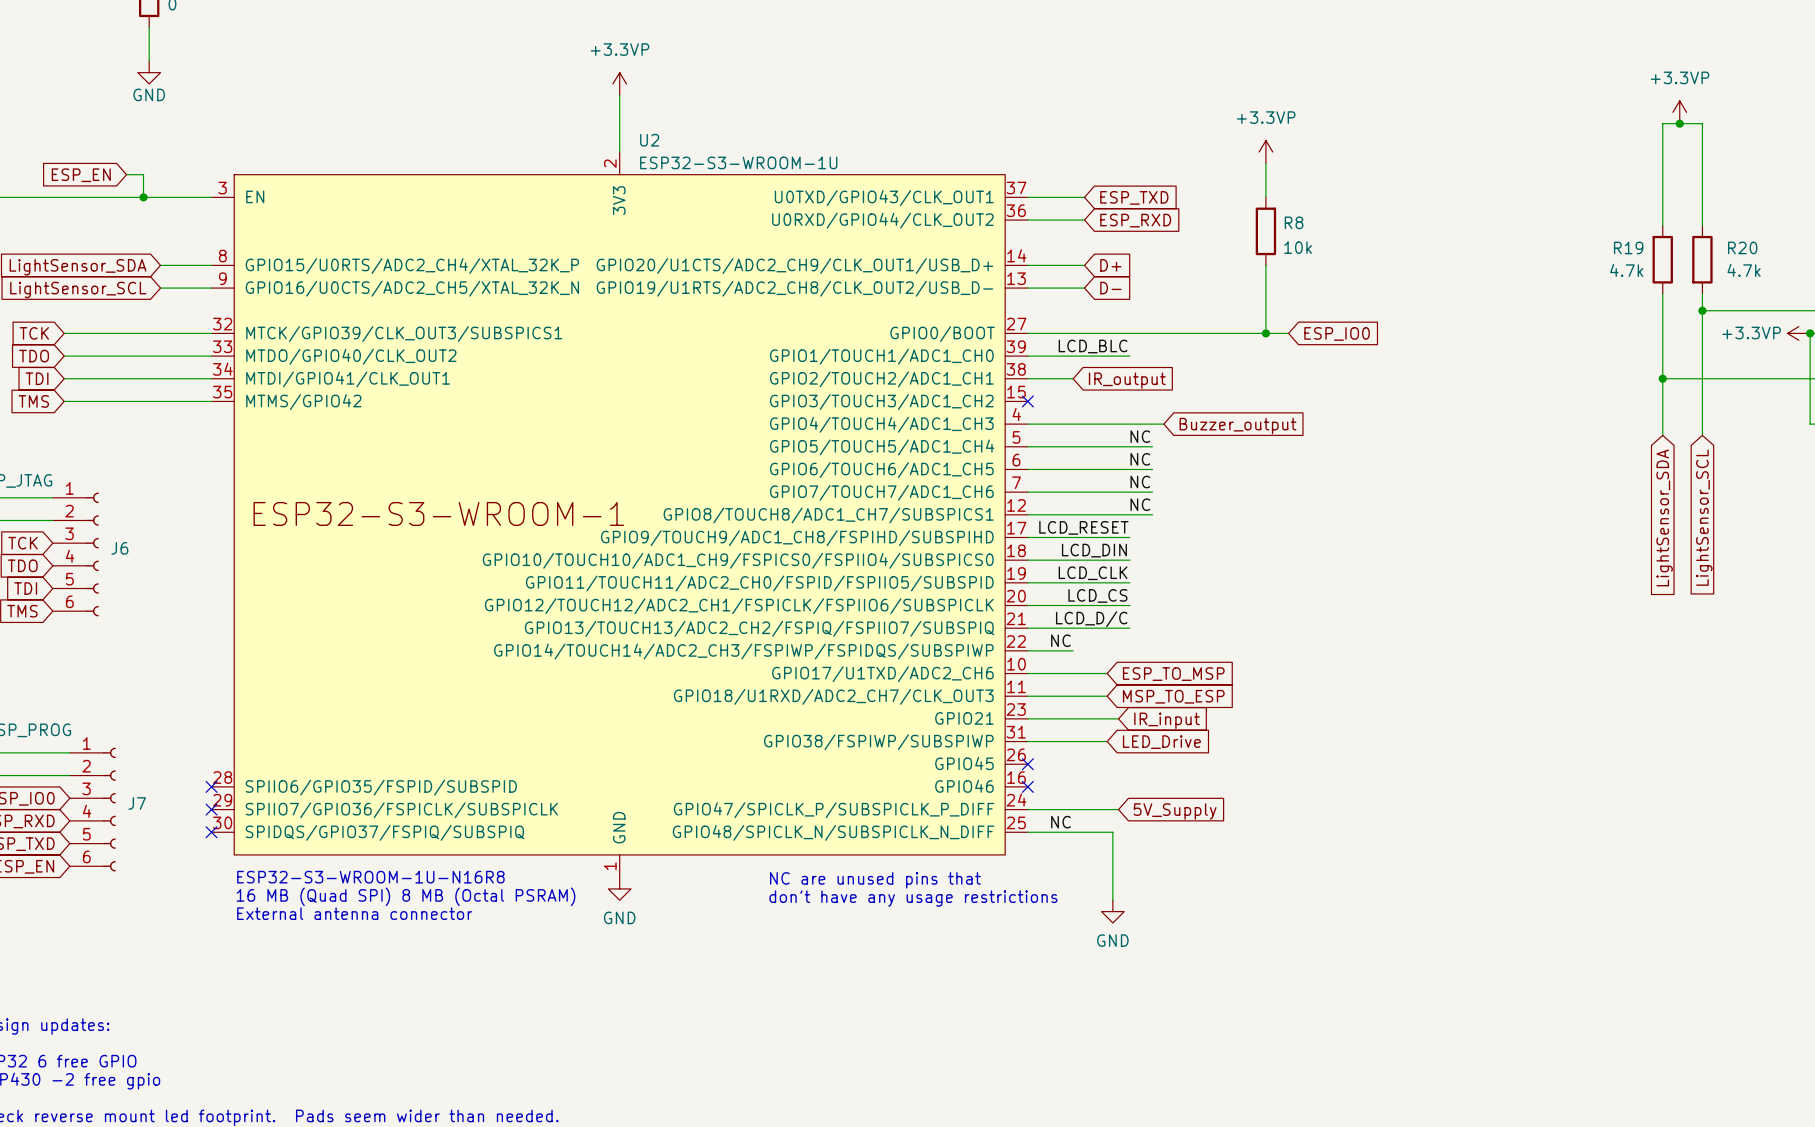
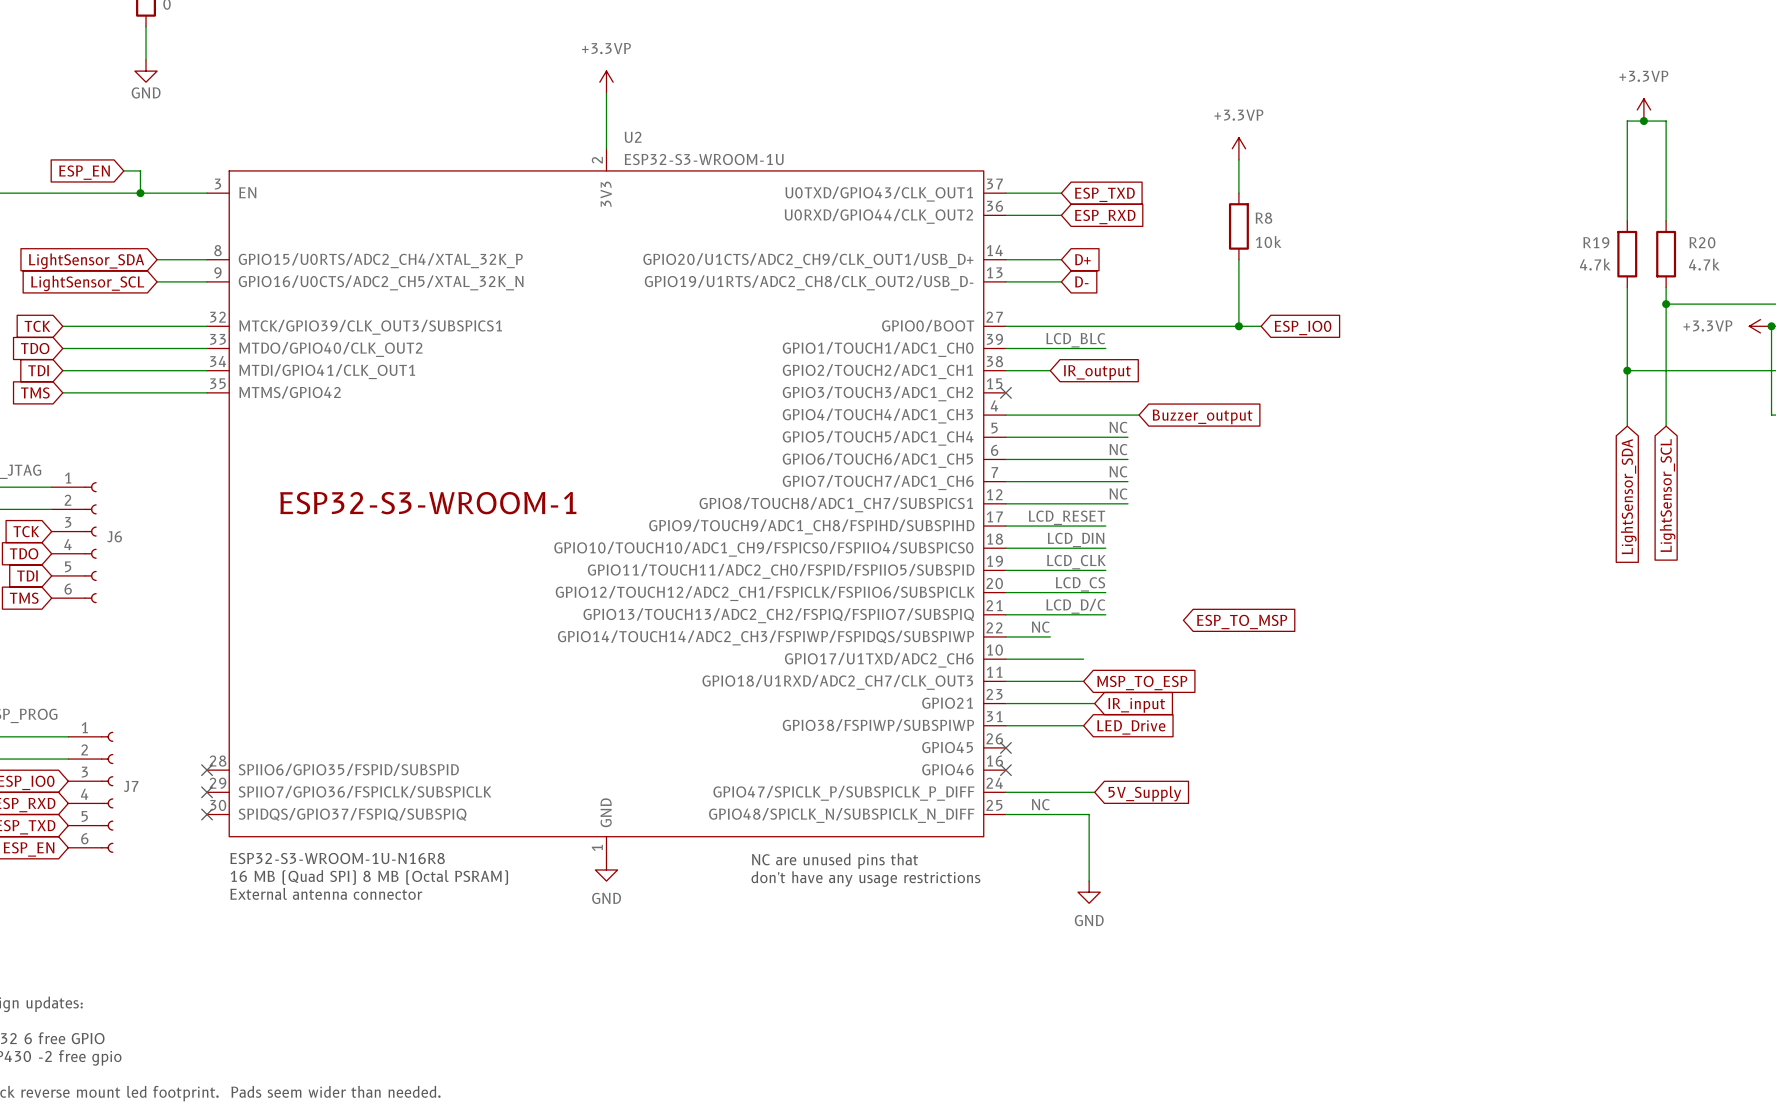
global label position: ESP_TO_MSP (1173, 674) -> ESP_TO_MSP (1242, 622)

